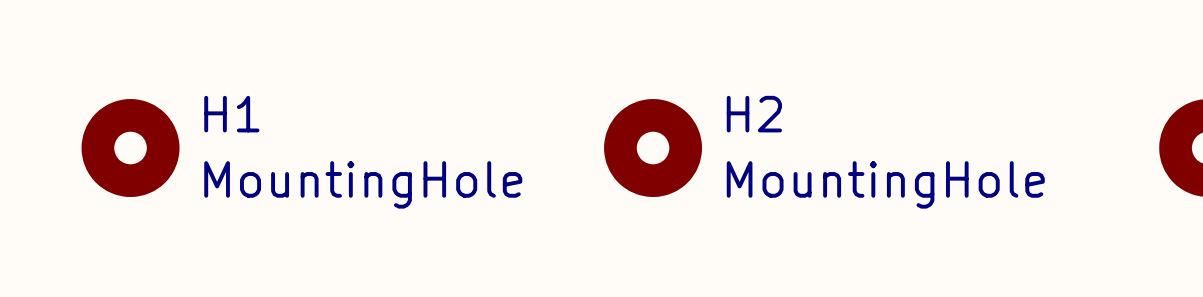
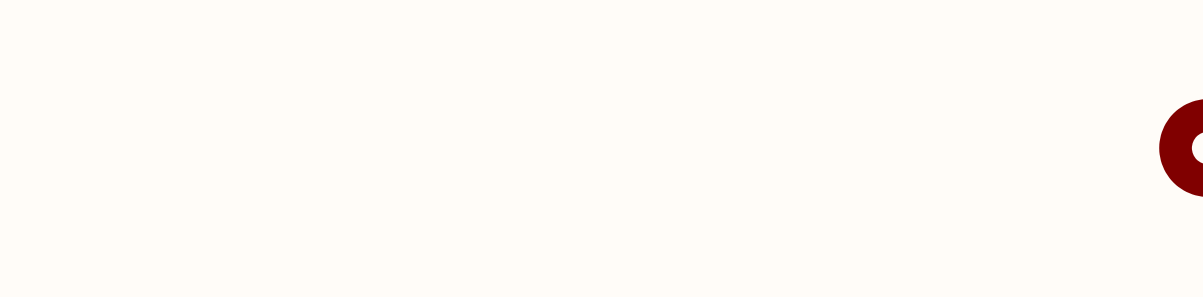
H1: MountingHole (130, 148) -> none
H2: MountingHole (653, 148) -> none

